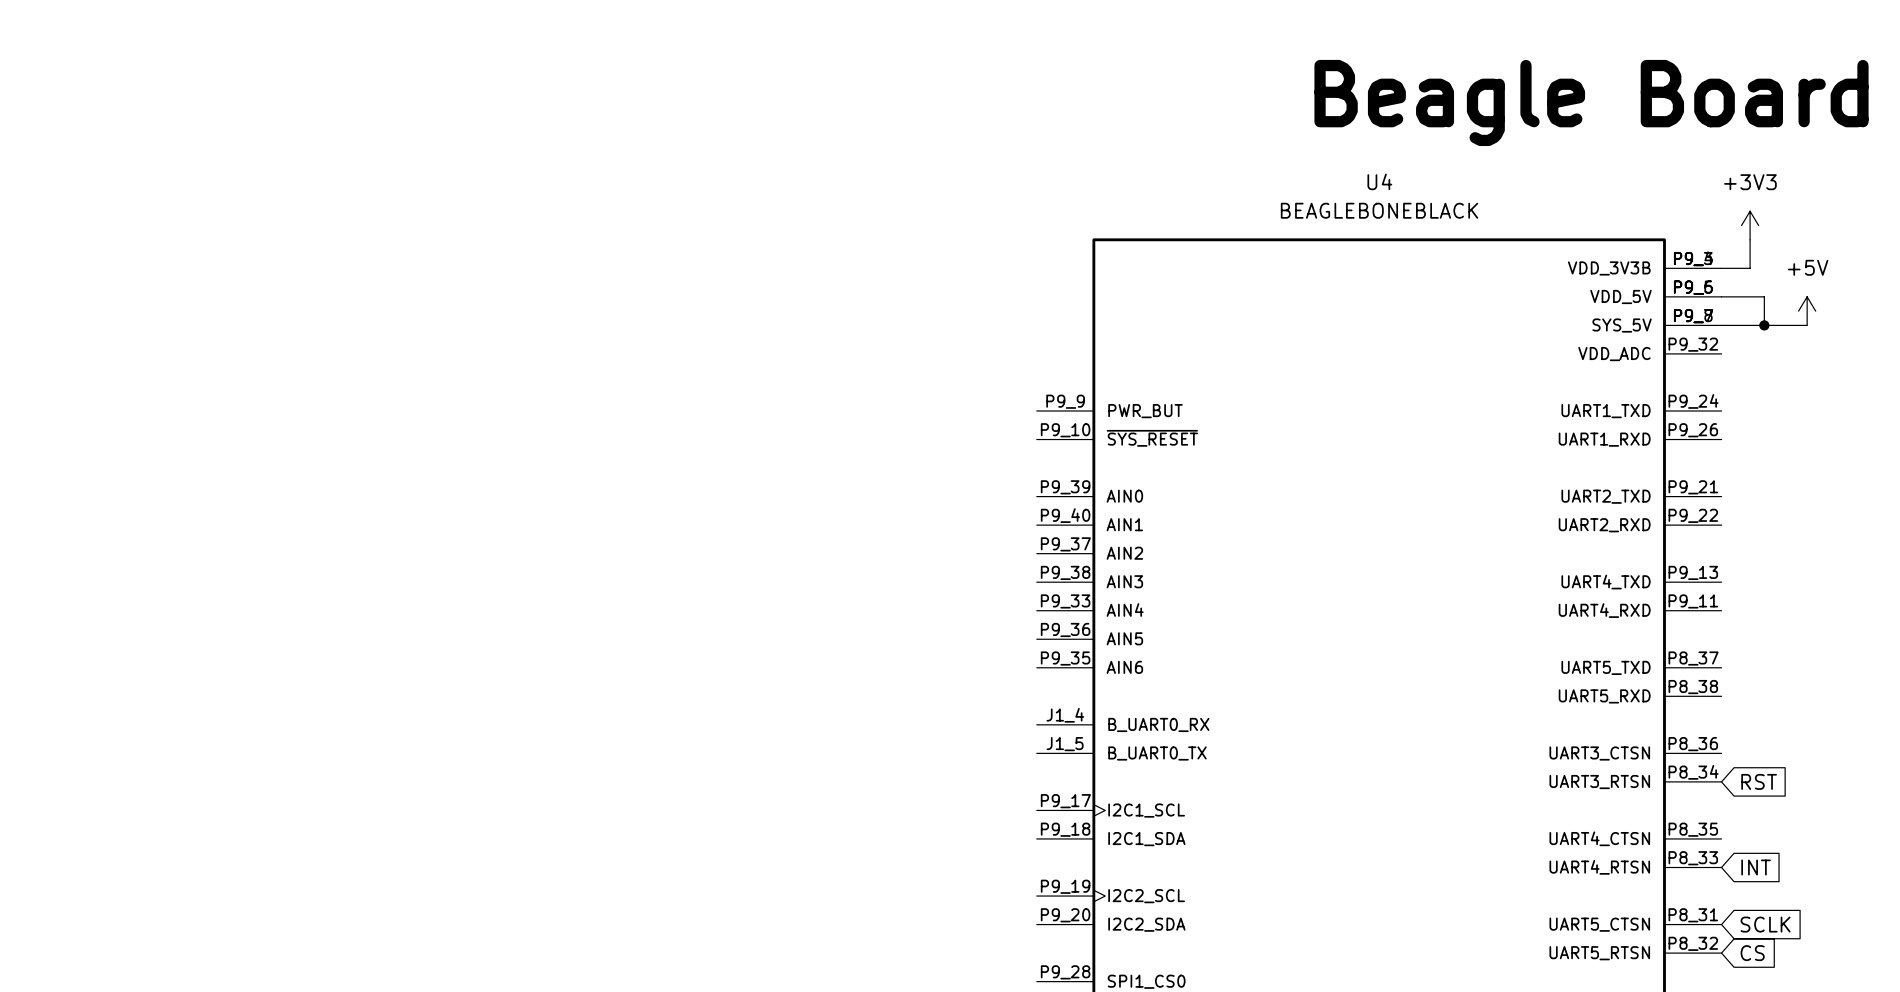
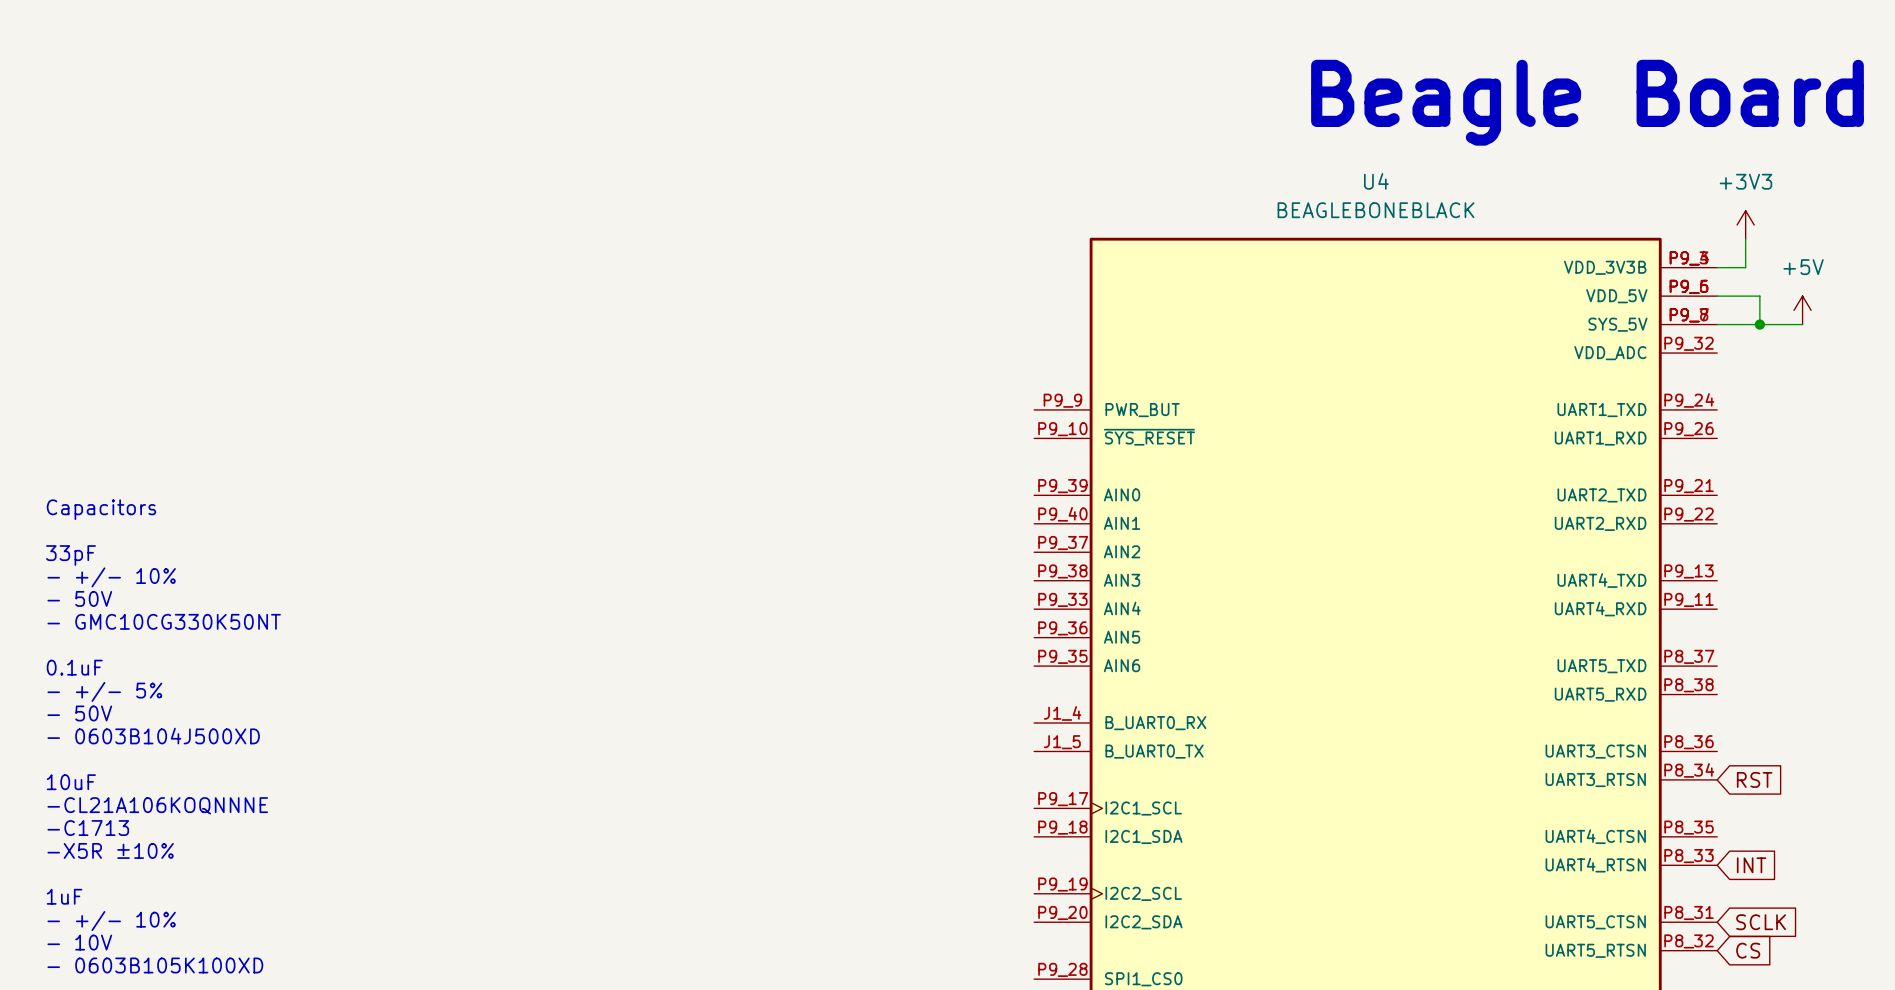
text: none -> Capacitors (101, 509)
text: none -> 33pF (70, 555)
text: none -> - +/- 10% (111, 577)
text: none -> - 50V (79, 598)
text: none -> - GMC10CG330K50NT (164, 621)
text: none -> 0.1uF (74, 667)
text: none -> - +/- 5% (104, 691)
text: none -> - 50V (79, 713)
text: none -> - 0603B104J500XD (153, 736)
text: none -> 10uF (71, 782)
text: none -> -CL21A106KOQNNNE (157, 805)
text: none -> -C1713 (88, 828)
text: none -> -X5R ±10% (110, 850)
text: none -> 1uF (64, 896)
text: none -> - +/- 10% (111, 921)
text: none -> - 10V (79, 942)
text: none -> - 0603B105K100XD (155, 965)

